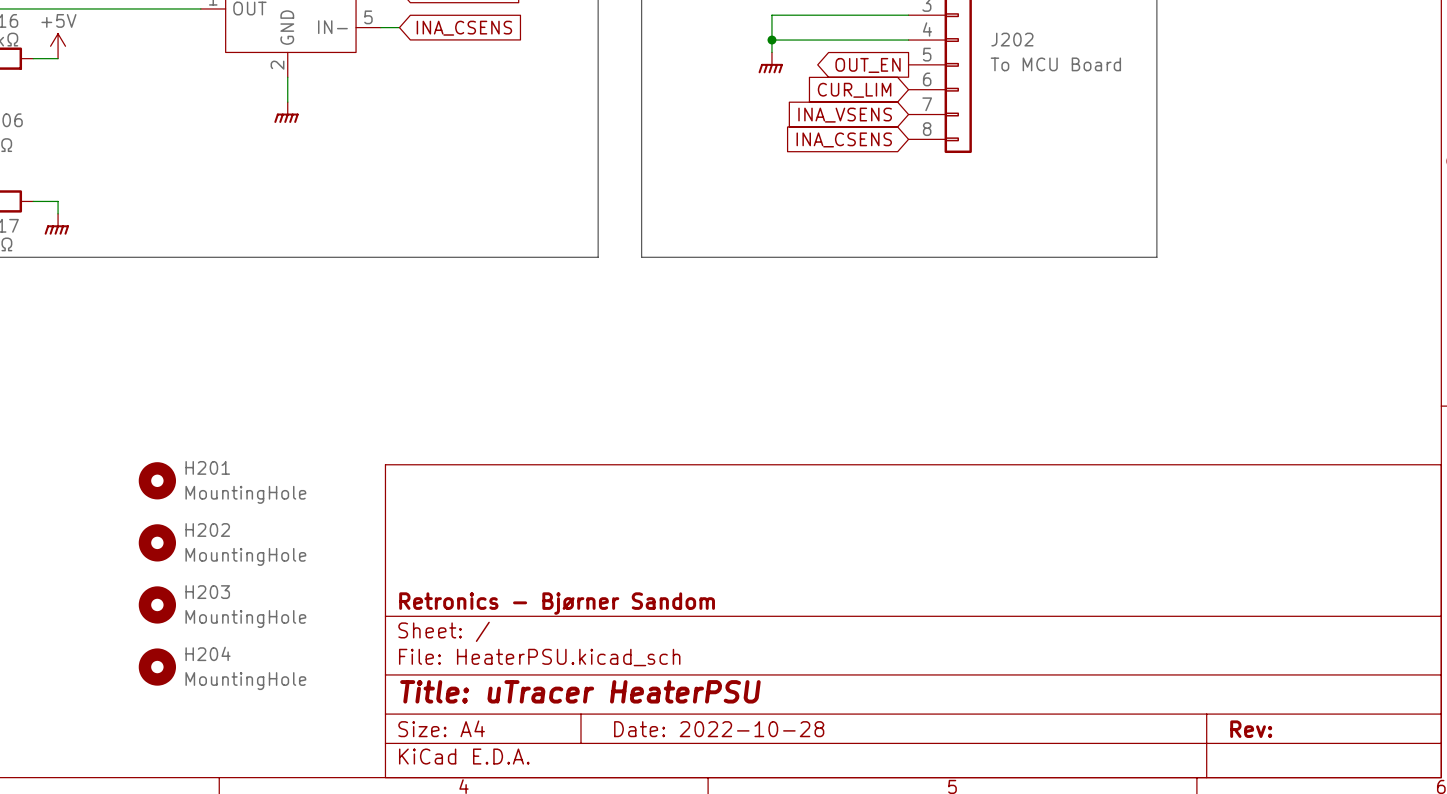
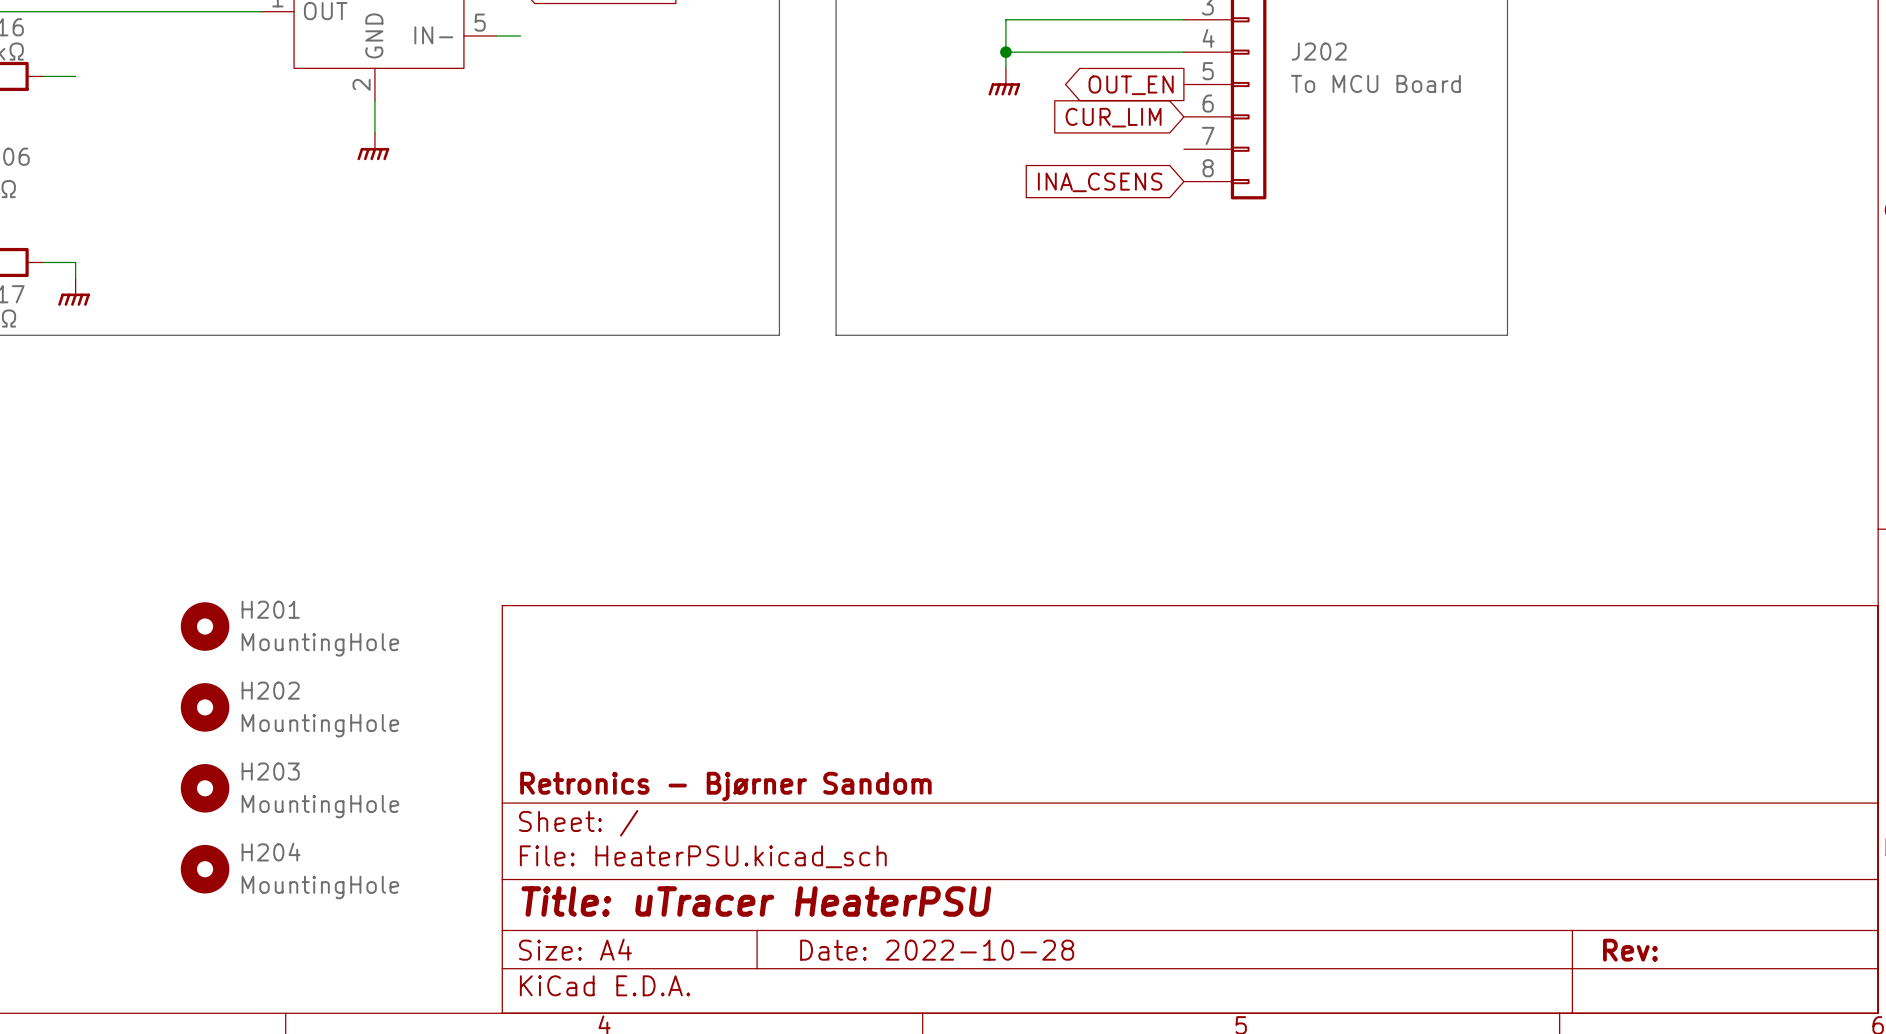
global label: INA_CSENS (464, 28) -> none
power symbol: +5V (58, 46) -> none
global label: INA_VSENS (845, 115) -> none

